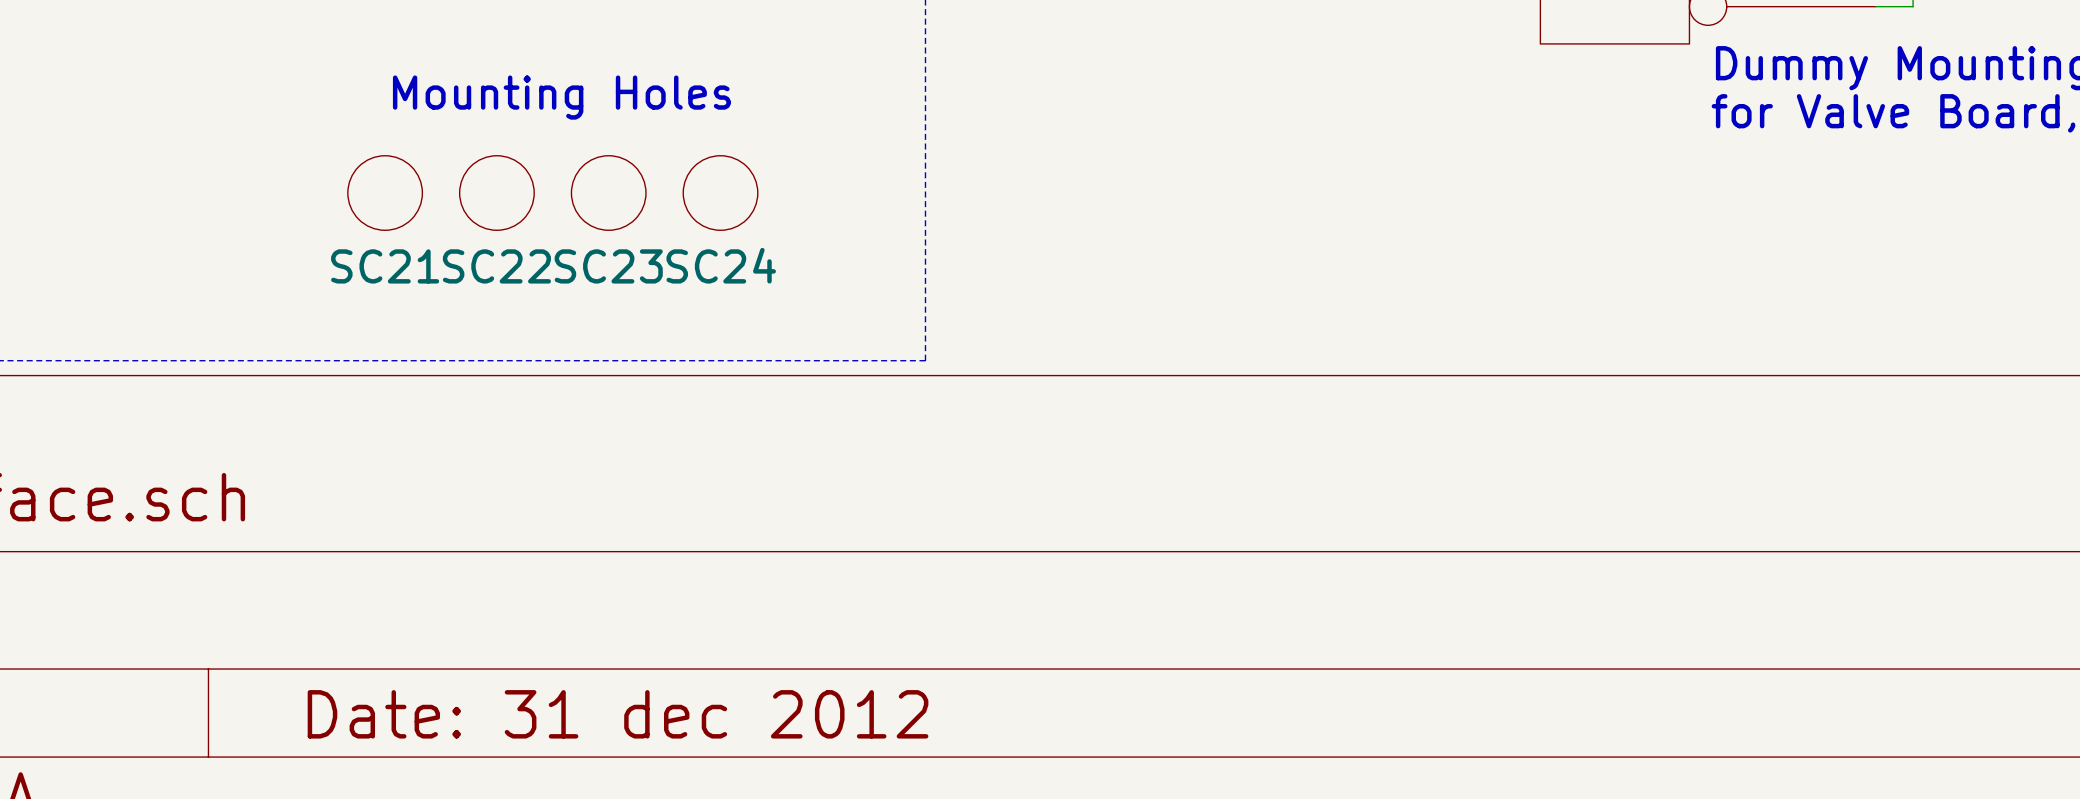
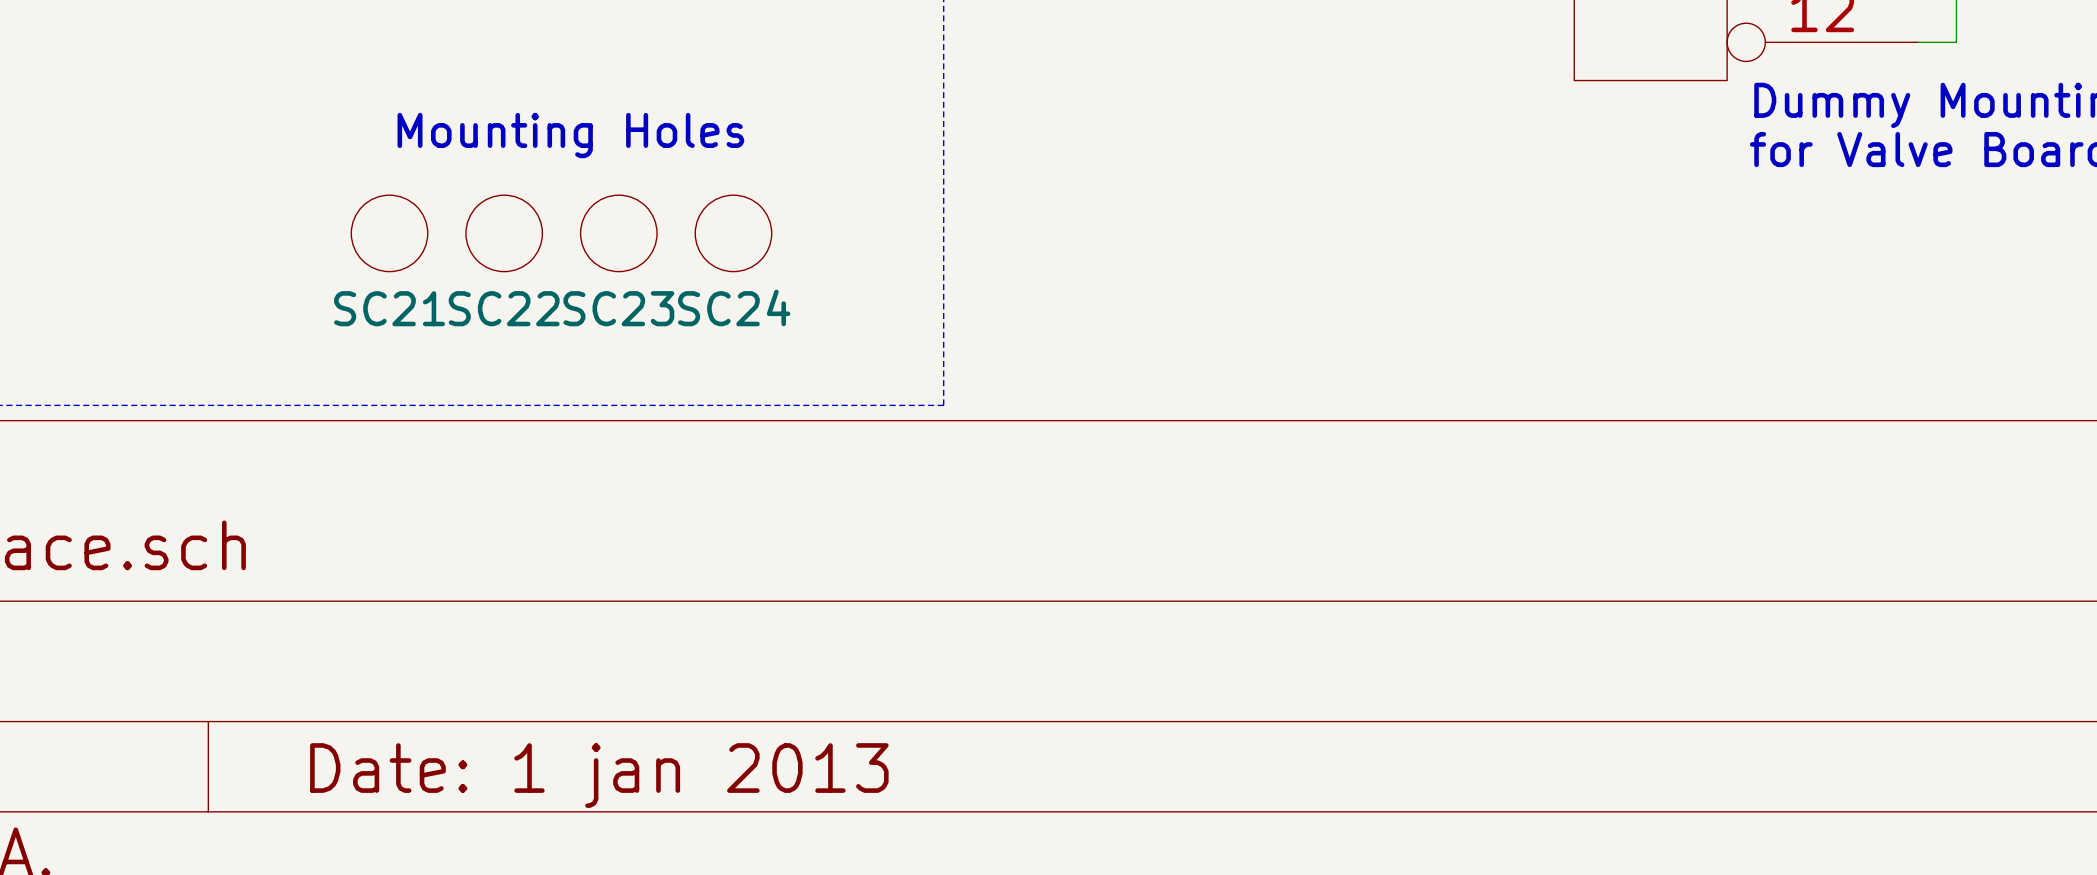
title block: Date: 31 dec 2012 (618, 714) -> Date: 1 jan 2013 (599, 775)

